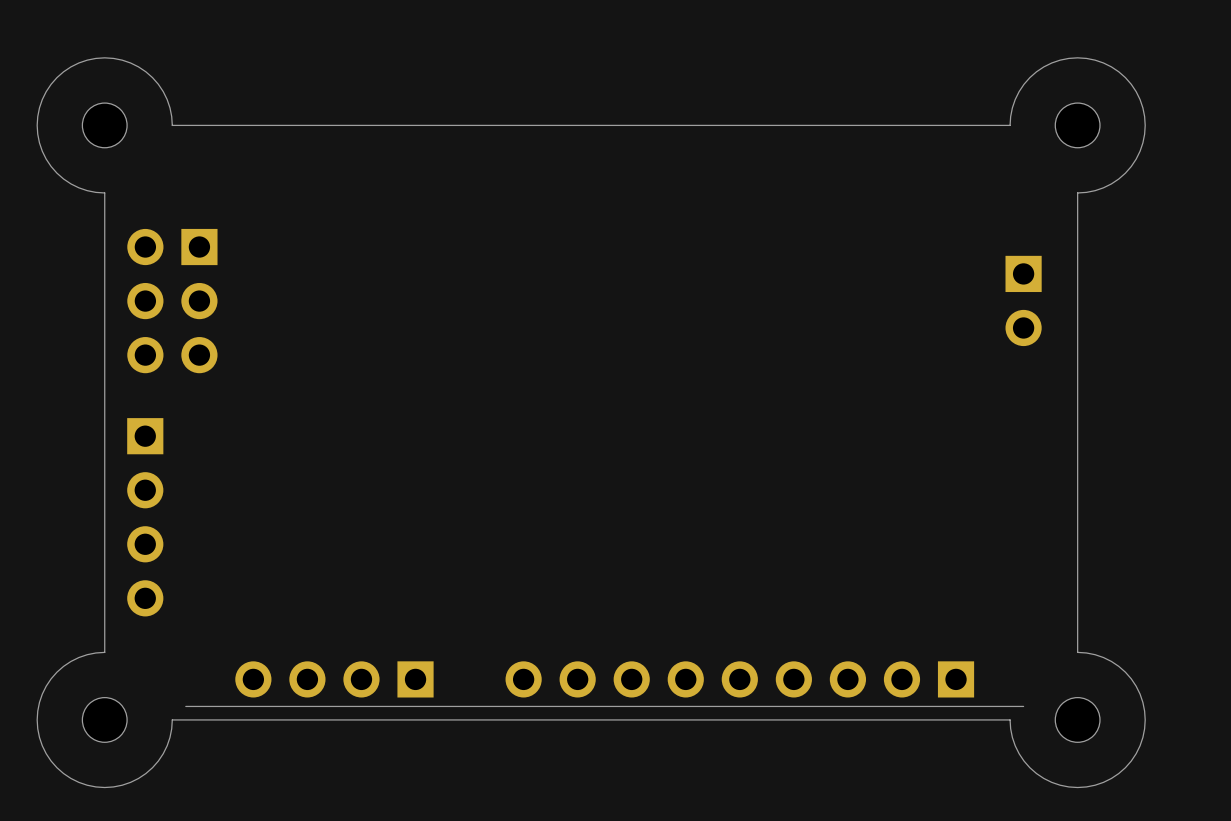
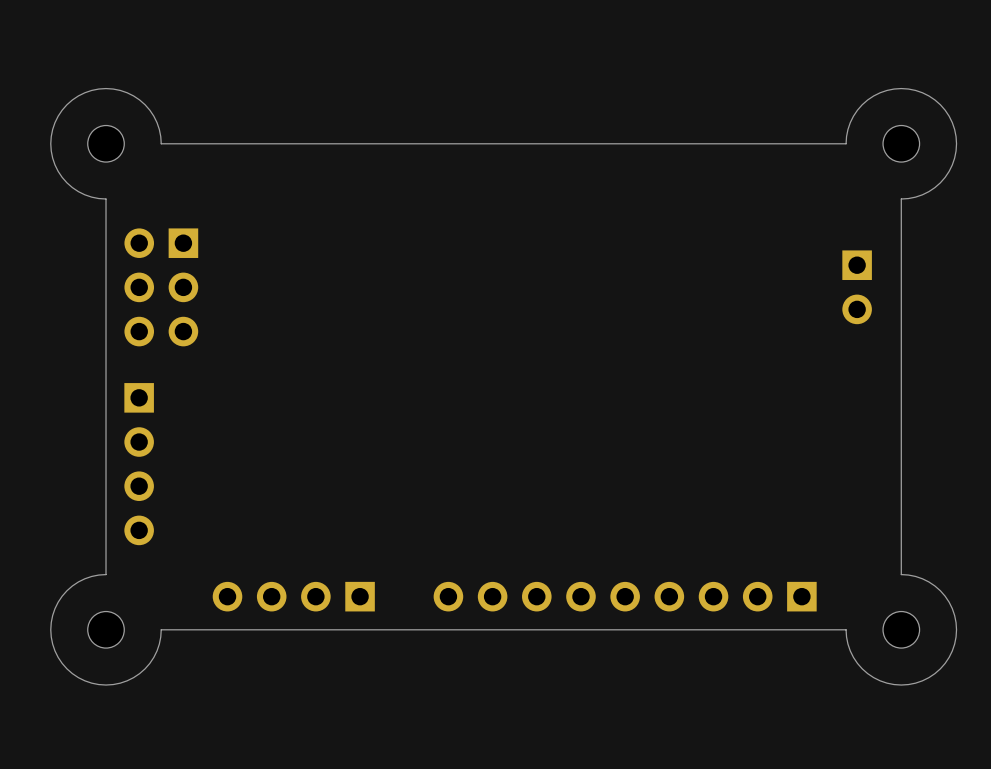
board edge: (1023, 706) (185, 706) -> none

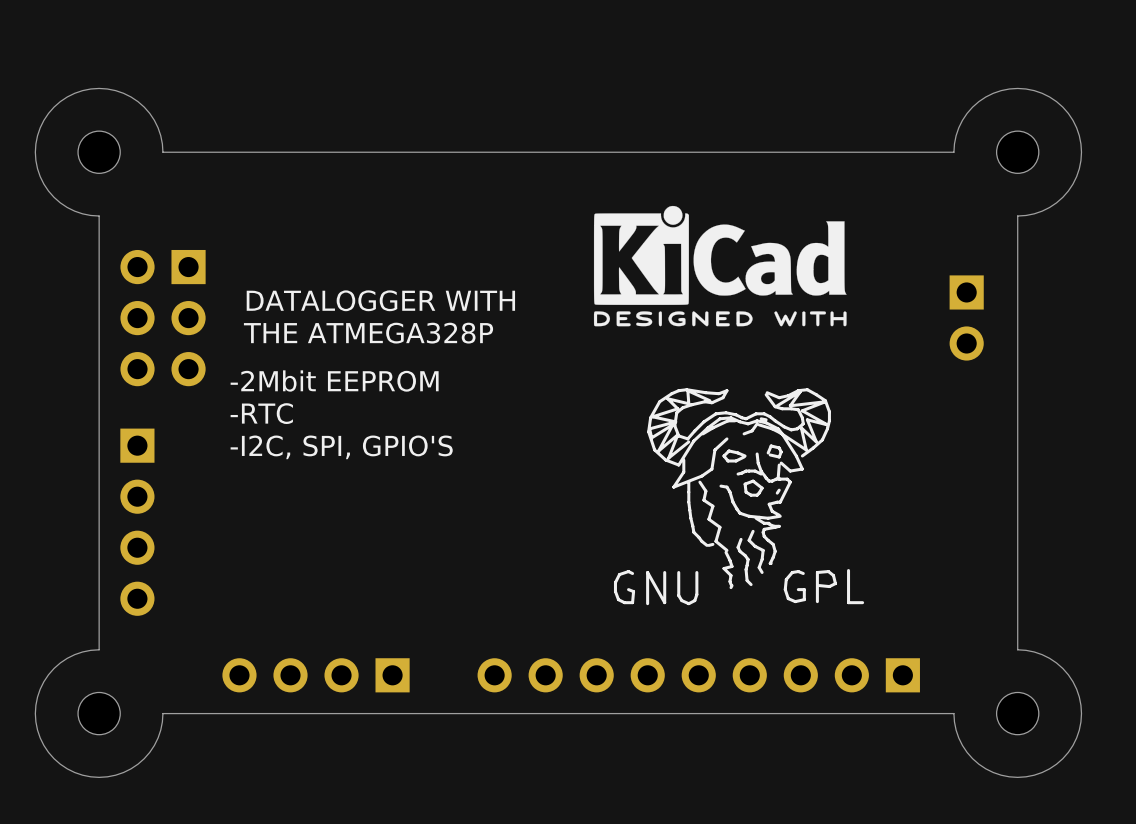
drawing: none -> [593, 205, 847, 327]
text: none -> DATALOGGER WITH (380, 300)
text: none -> THE ATMEGA328P (368, 333)
text: none -> -2Mbit EEPROM (334, 381)
drawing: none -> [613, 388, 865, 606]
text: none -> -RTC (261, 413)
text: none -> -I2C, SPI, GPIO'S (341, 447)

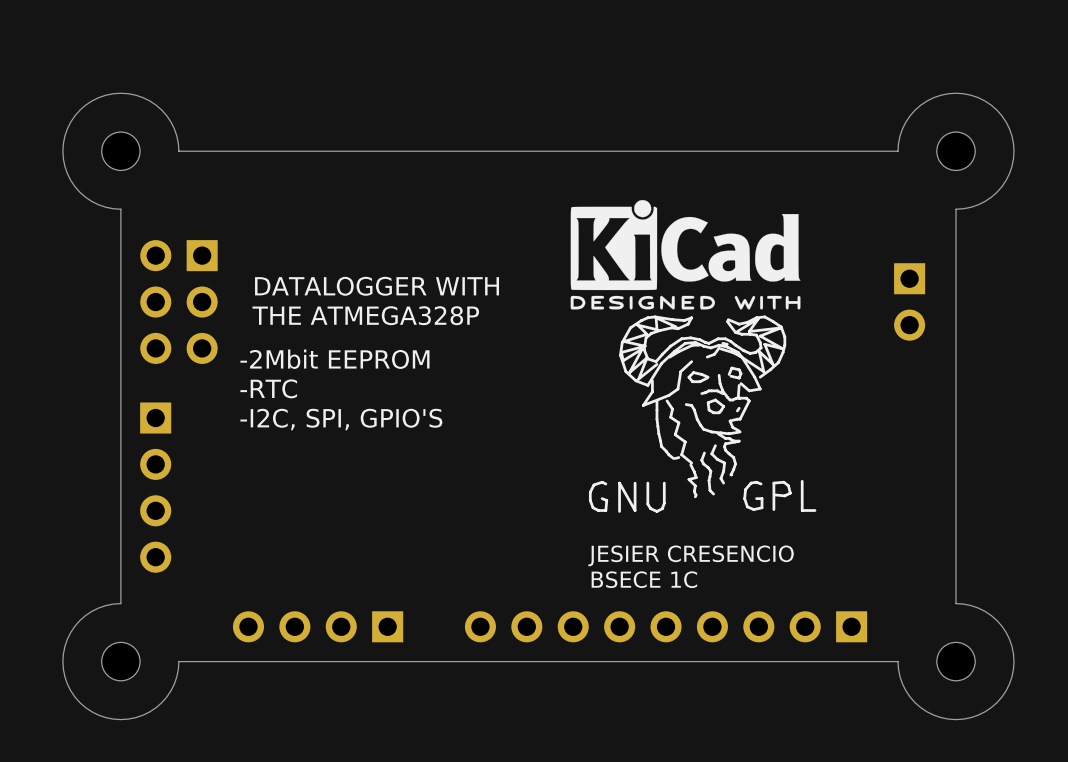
drawing position: (739, 496) -> (702, 414)
text: none -> JESIER CRESENCIO (691, 555)
text: none -> BSECE 1C (644, 579)

